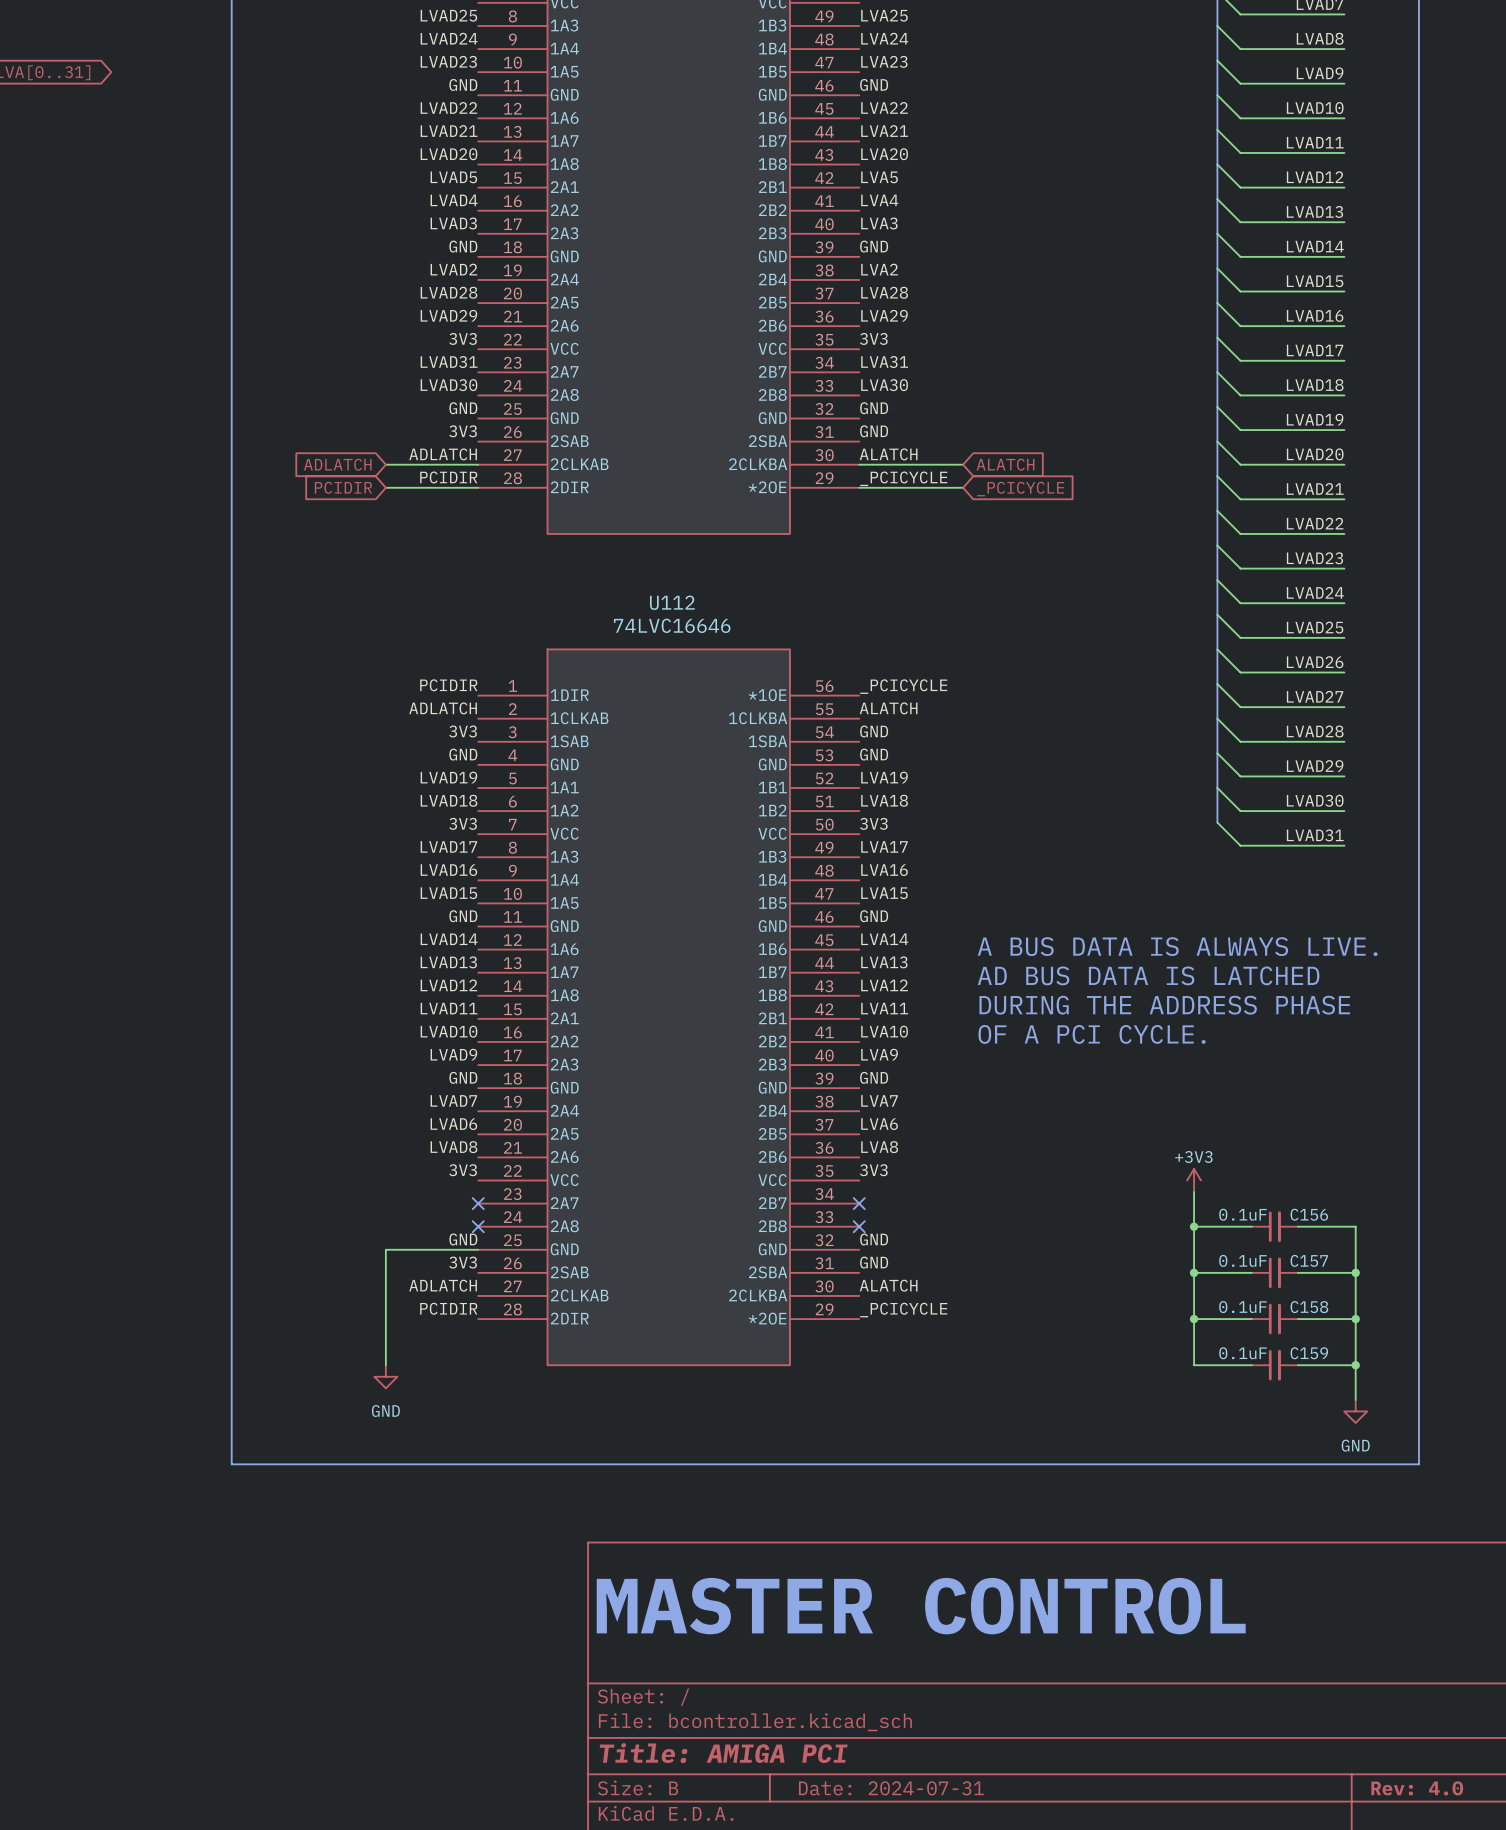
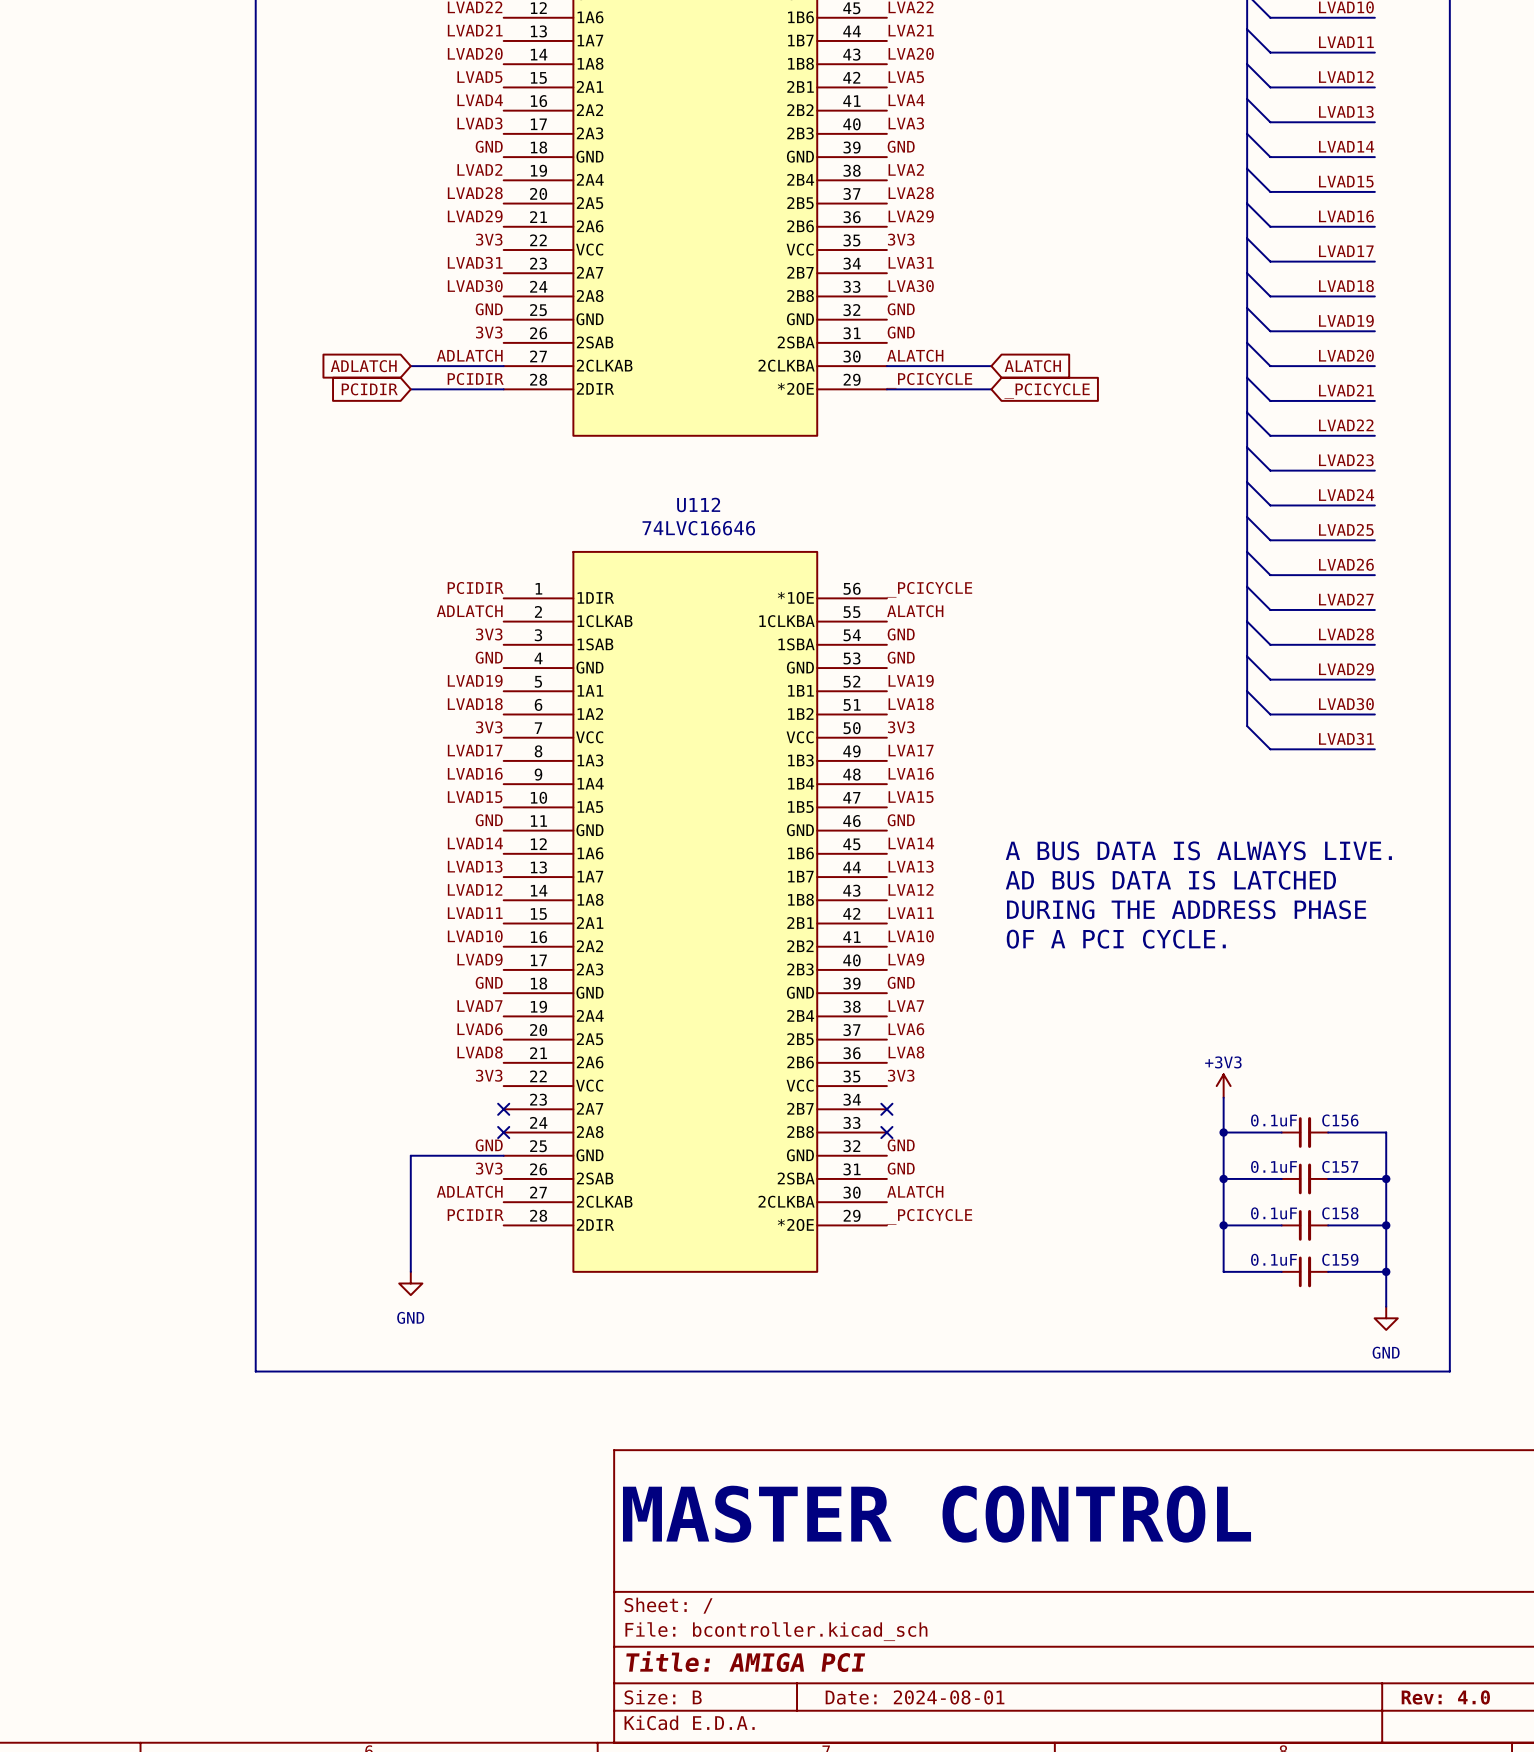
title block: Date: 2024-07-31 (891, 1788) -> Date: 2024-08-01 (915, 1697)

